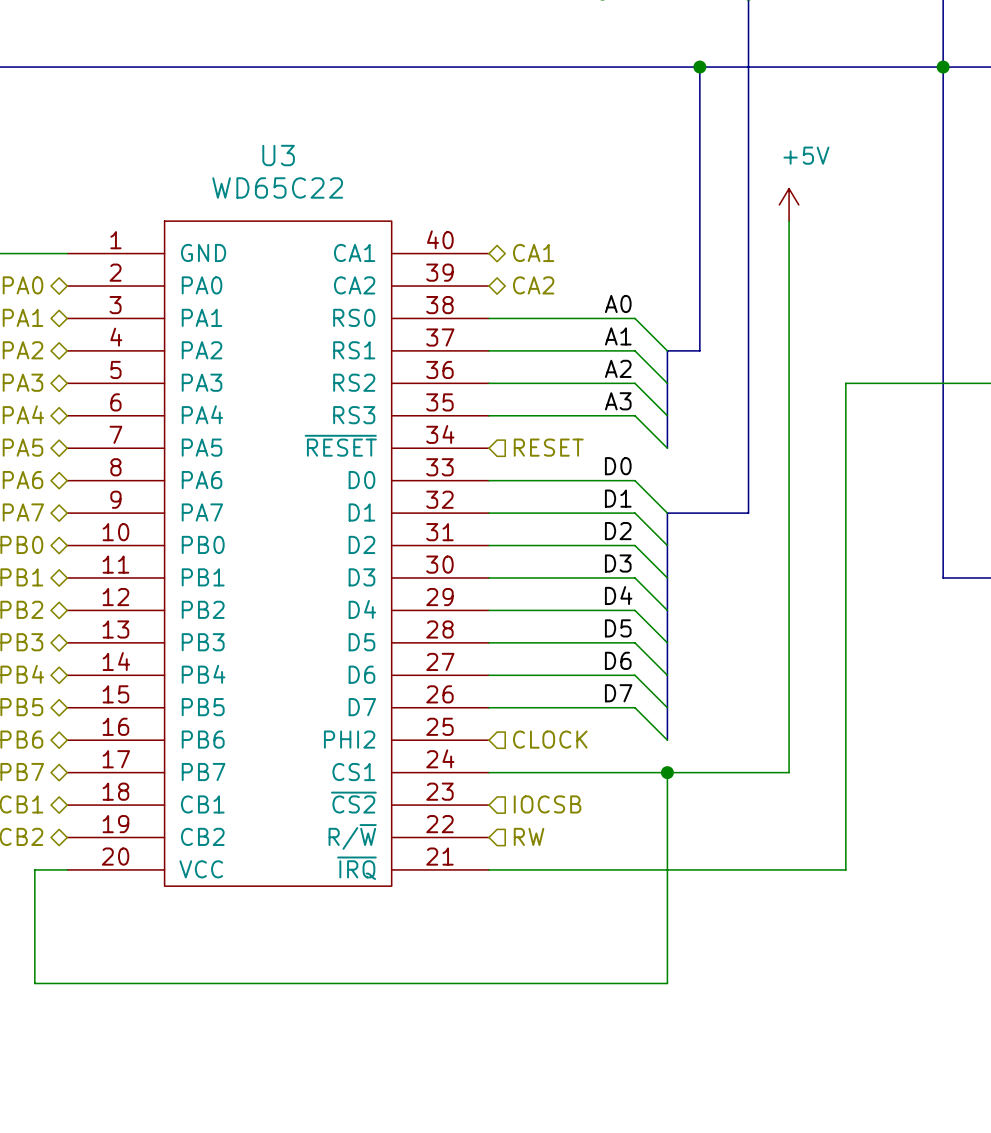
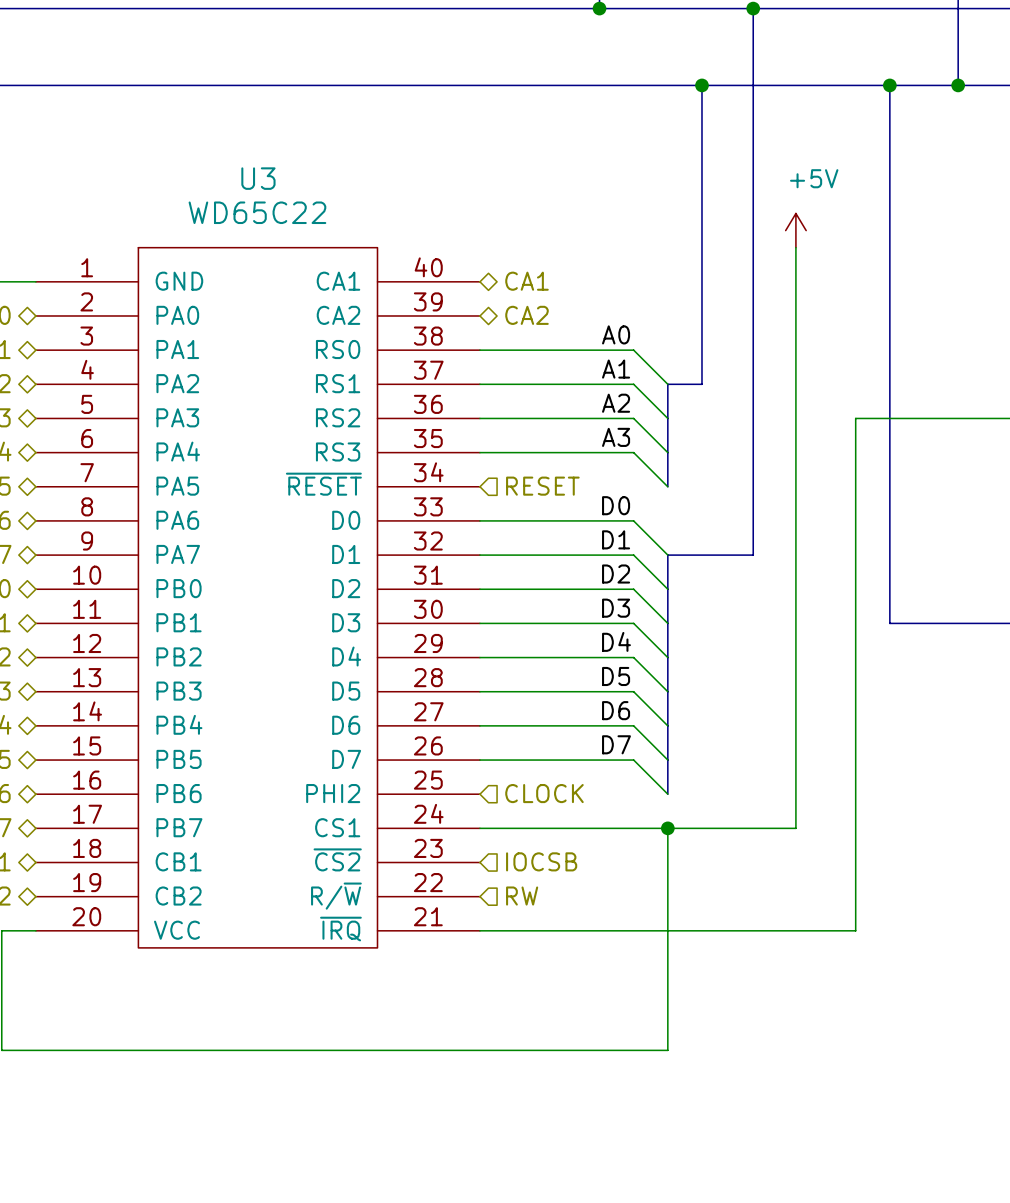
junction: none -> (889, 85)
bus: (943, 67) (943, 577) -> (889, 85) (889, 623) (958, 623)

